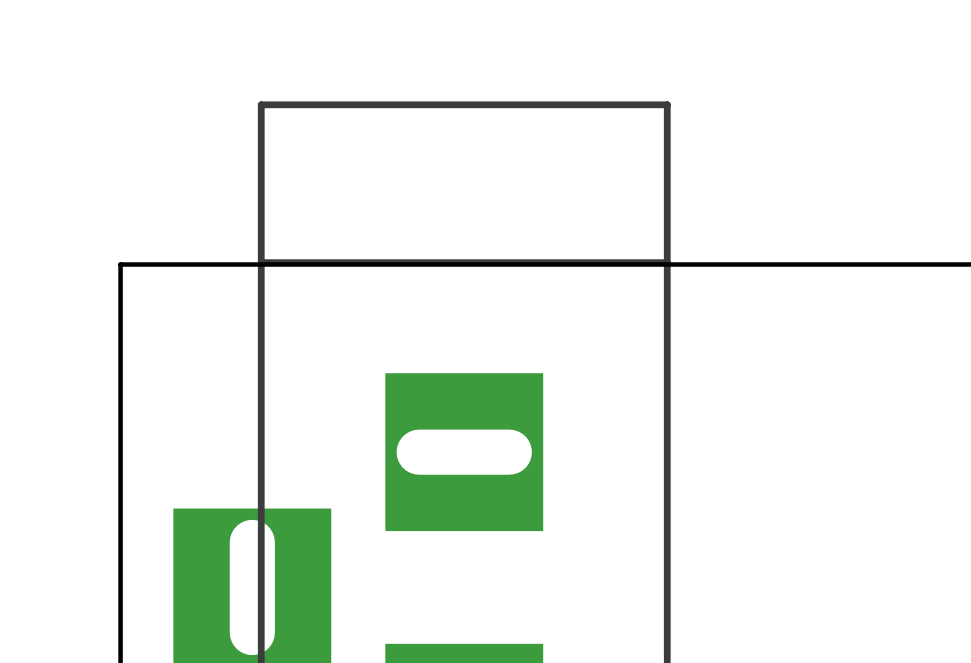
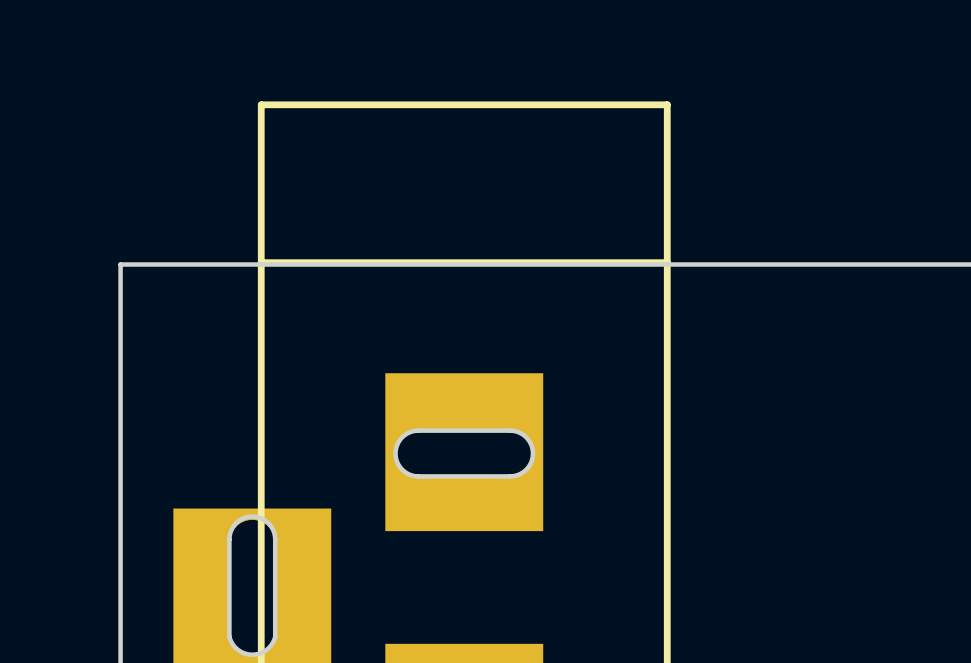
board edge: none -> (418, 430) (516, 431) (524, 435) (529, 442) (532, 450) (532, 459) (526, 469) (513, 476) (412, 475) (404, 471) (398, 464) (395, 450) (402, 437) (409, 432) (418, 430)
board edge: none -> (229, 539) (229, 636) (234, 646) (241, 652) (249, 654) (257, 654) (269, 646) (275, 636) (274, 533) (266, 521) (258, 517) (249, 516) (236, 523) (231, 530) (229, 539)

